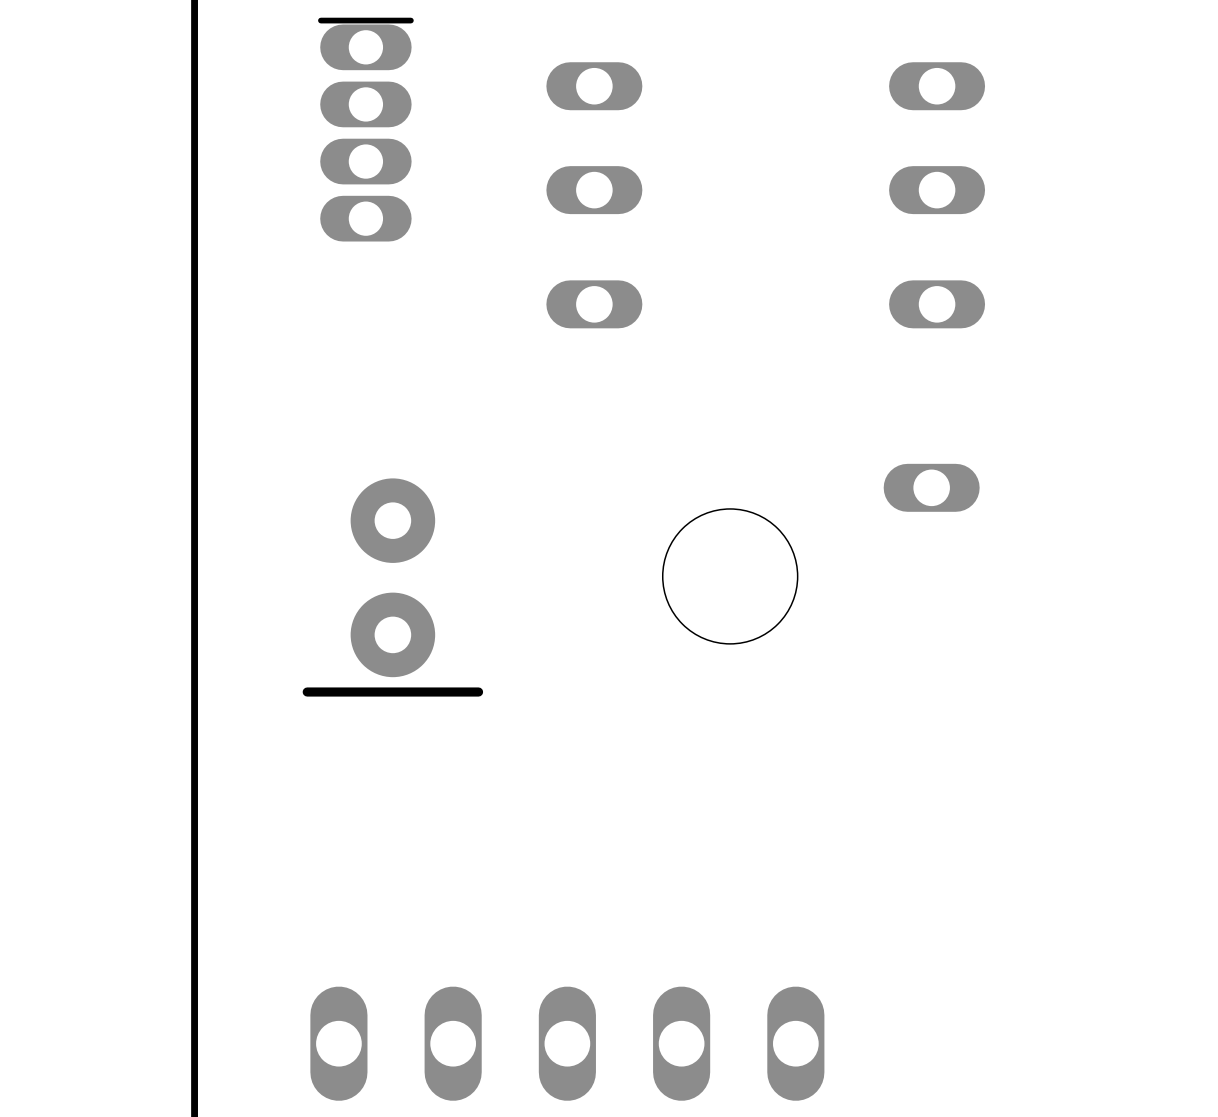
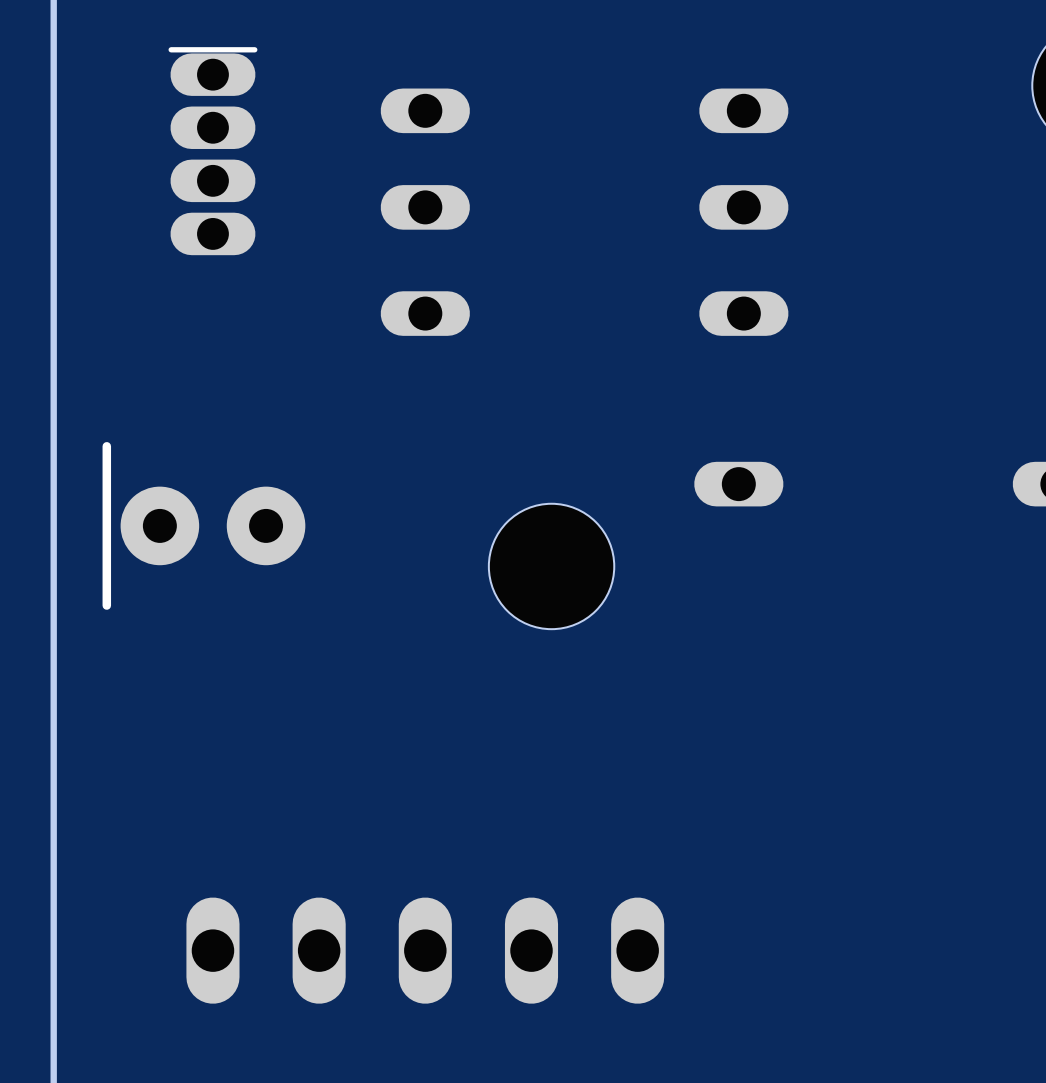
part rotation: 0° (392, 587) -> 90° clockwise (203, 525)
part position: (567, 1043) -> (425, 950)

